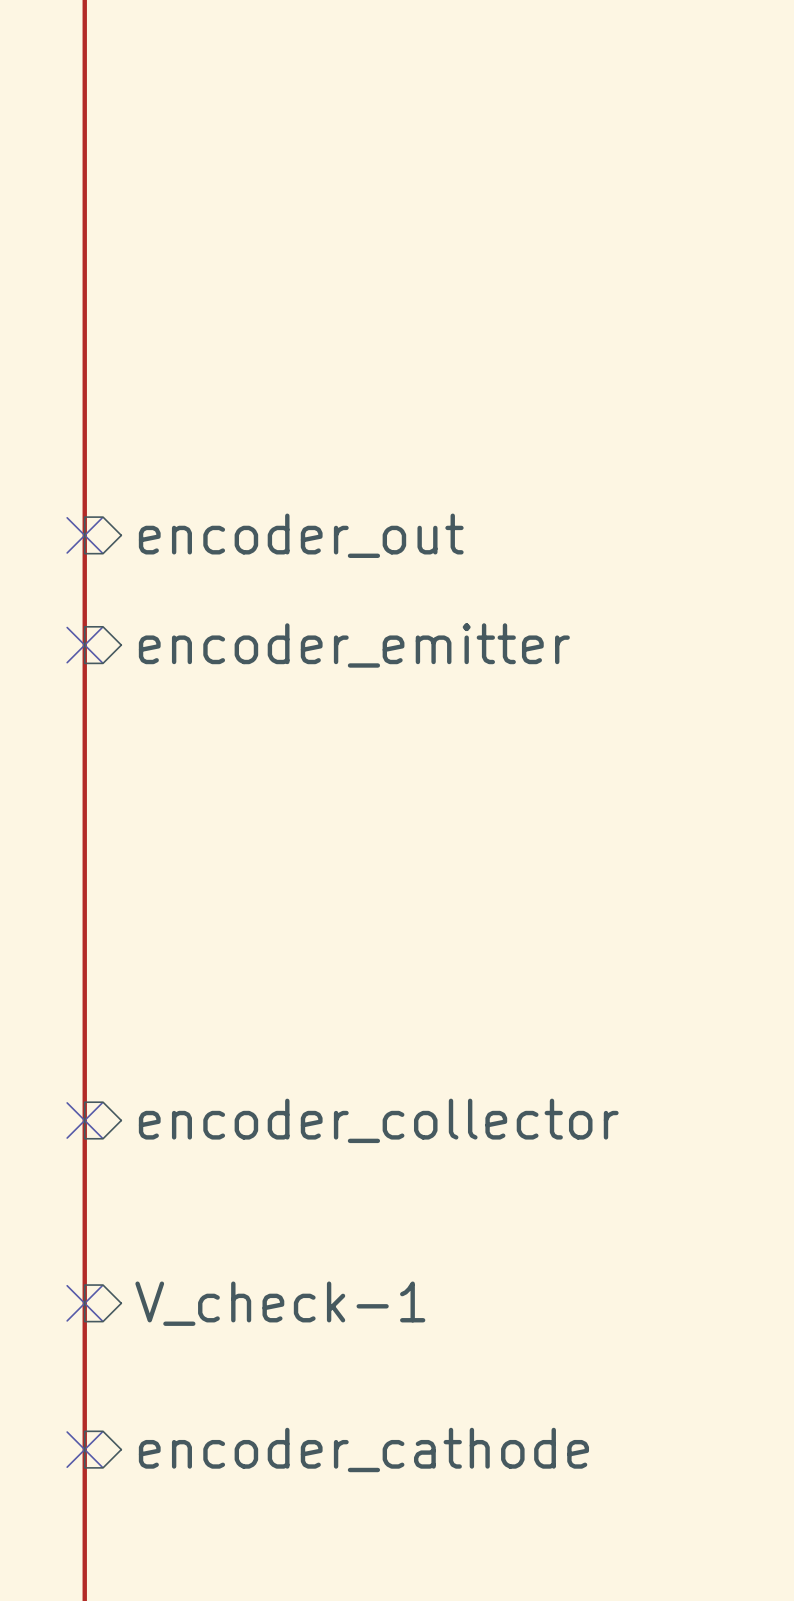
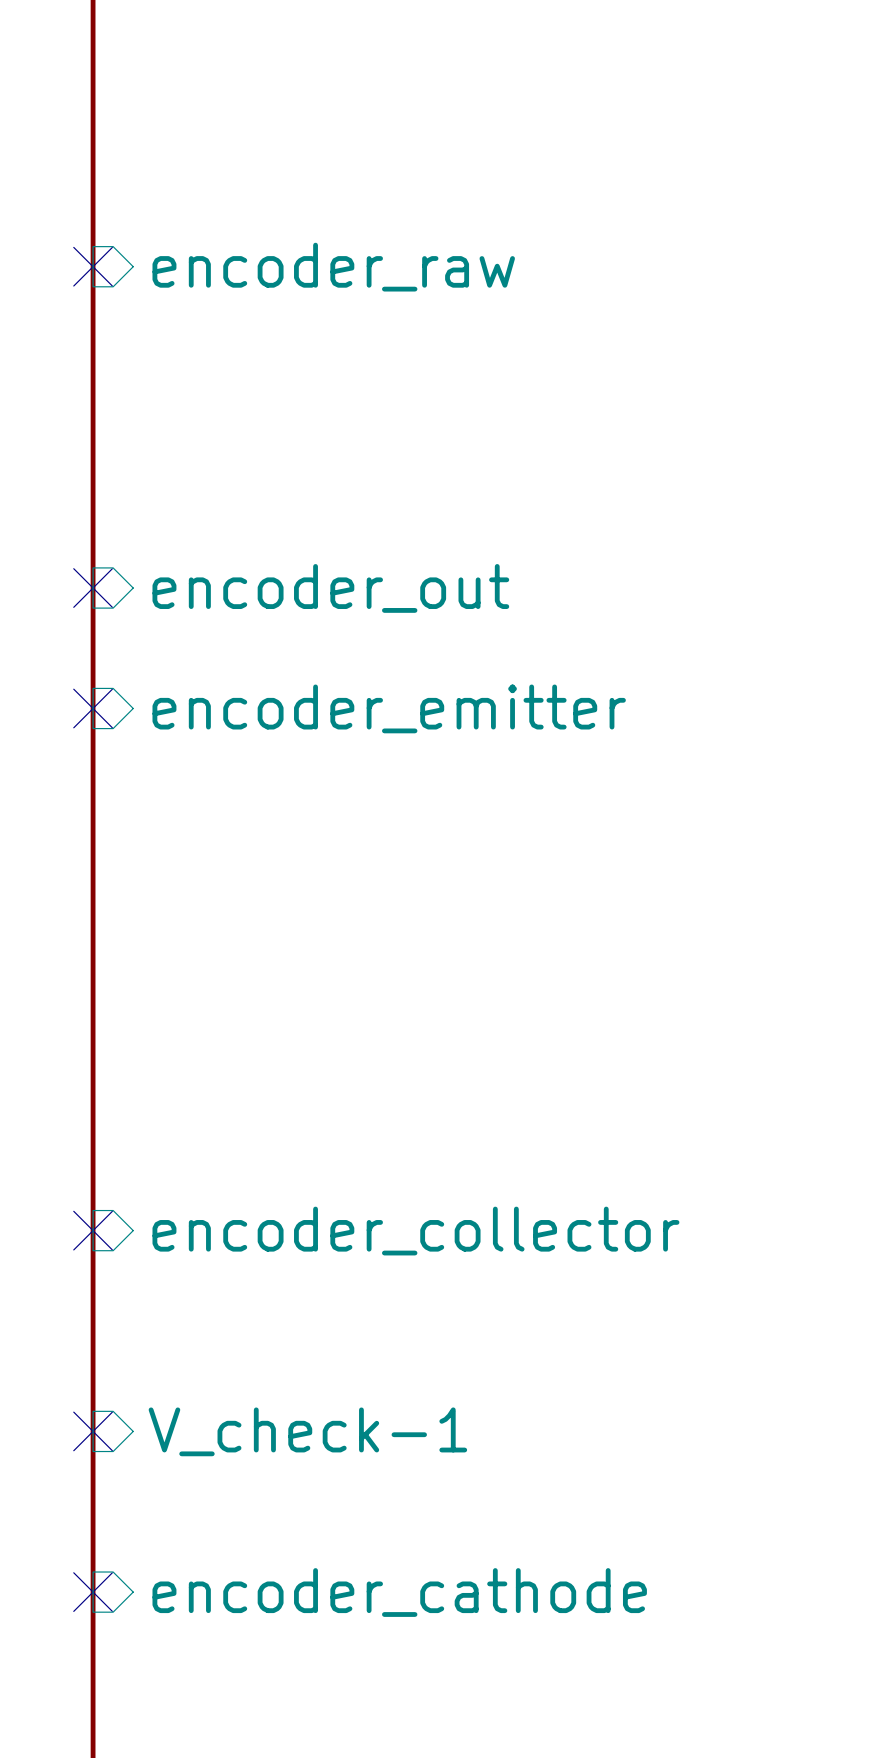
no-connect mark: none -> (93, 266)
sheet pin: none -> encoder_raw (333, 267)

